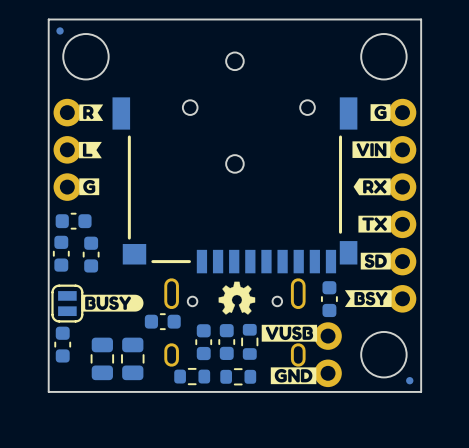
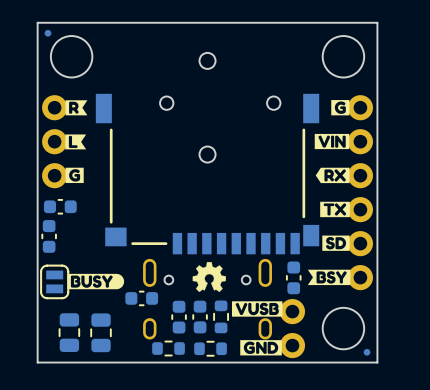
part: (91, 254) -> none
part: (62, 344) -> none
part: (102, 358) -> none
part: (132, 358) -> none
part: none -> (69, 332)
part: none -> (101, 332)

